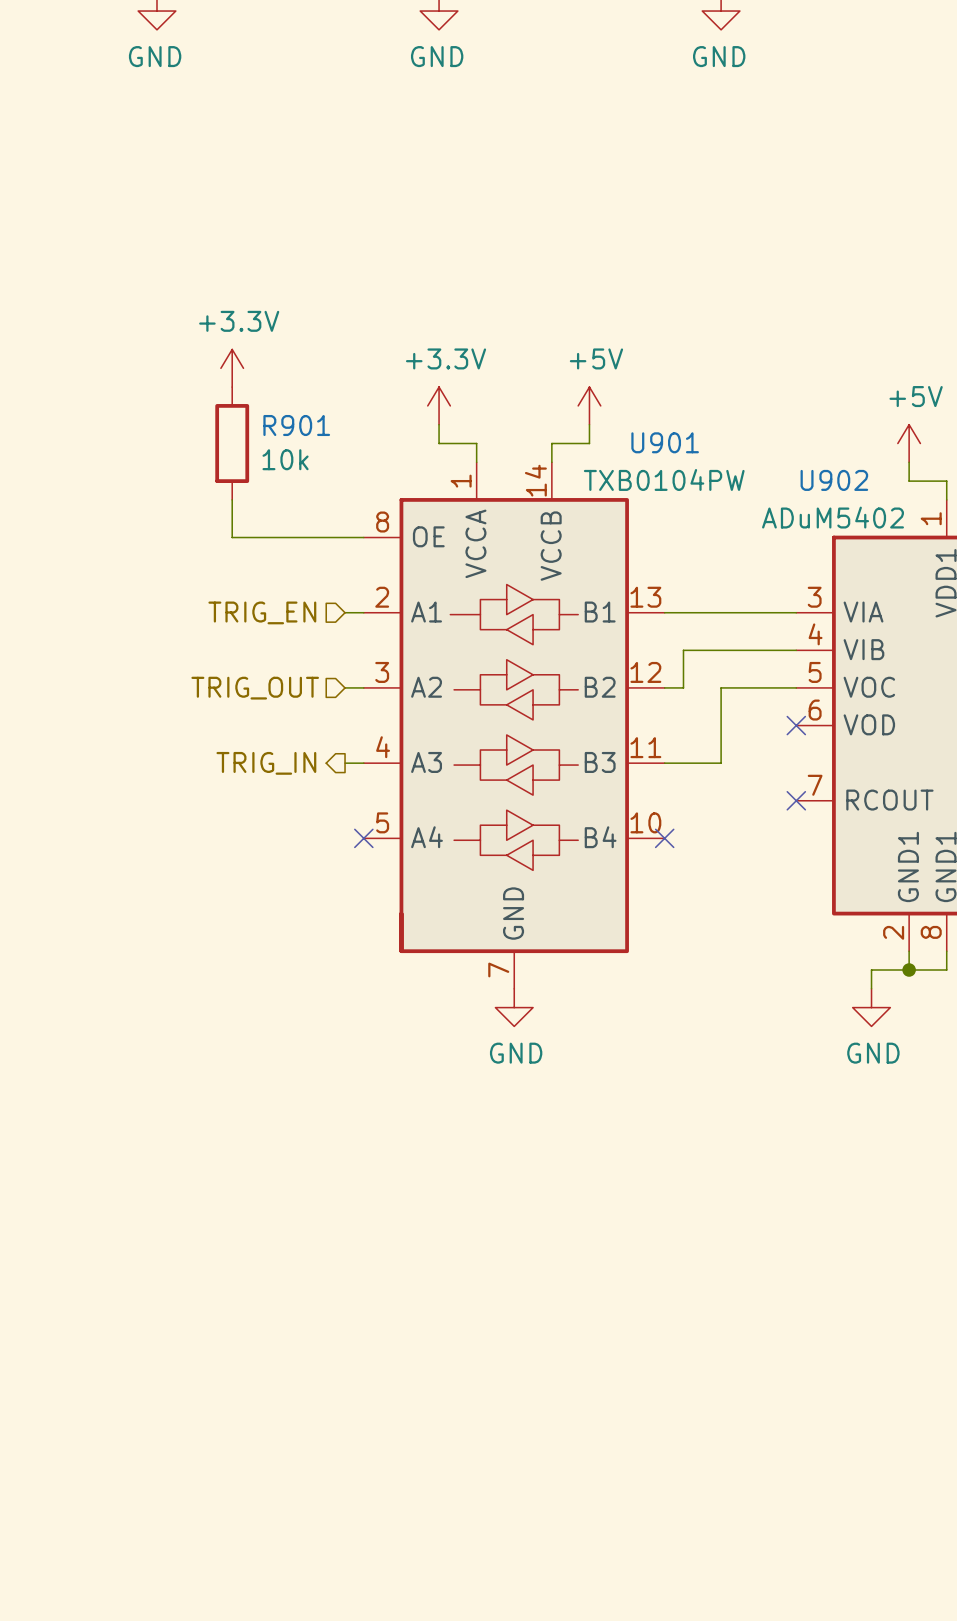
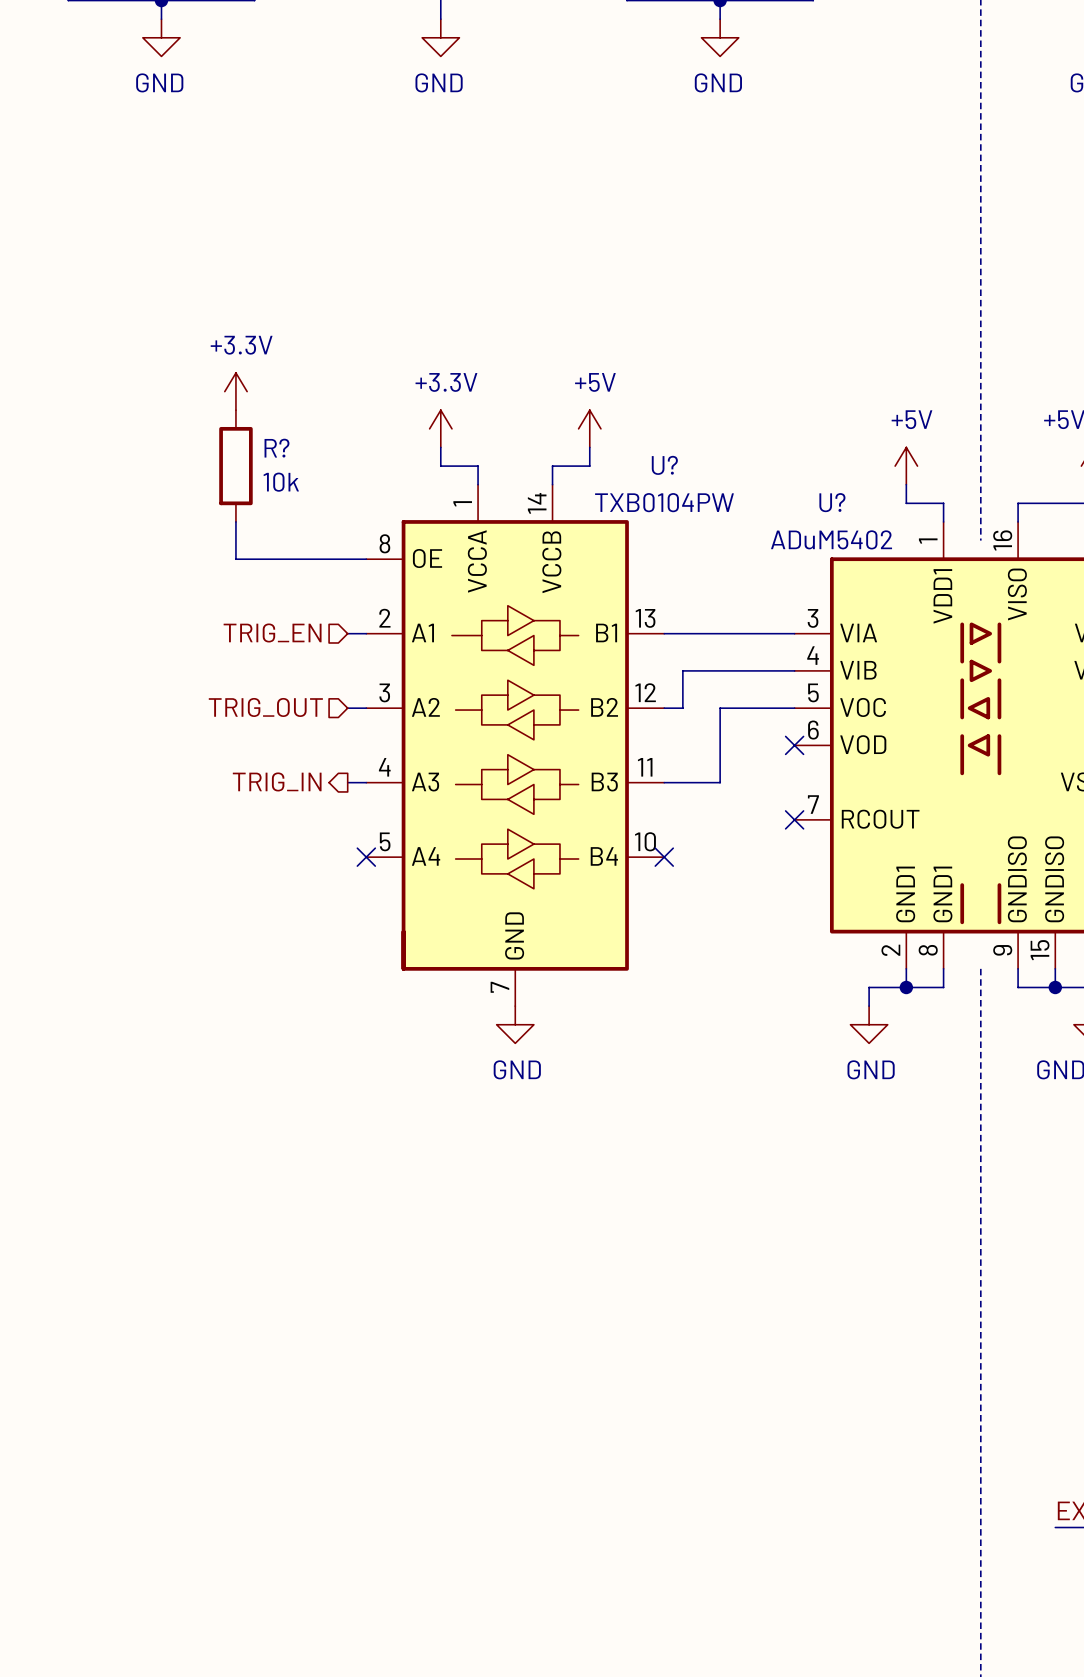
R901 name: R901 (296, 425) -> R? (276, 448)
U901 name: U901 (665, 442) -> U? (664, 465)
U902 name: U902 (834, 480) -> U? (832, 502)

